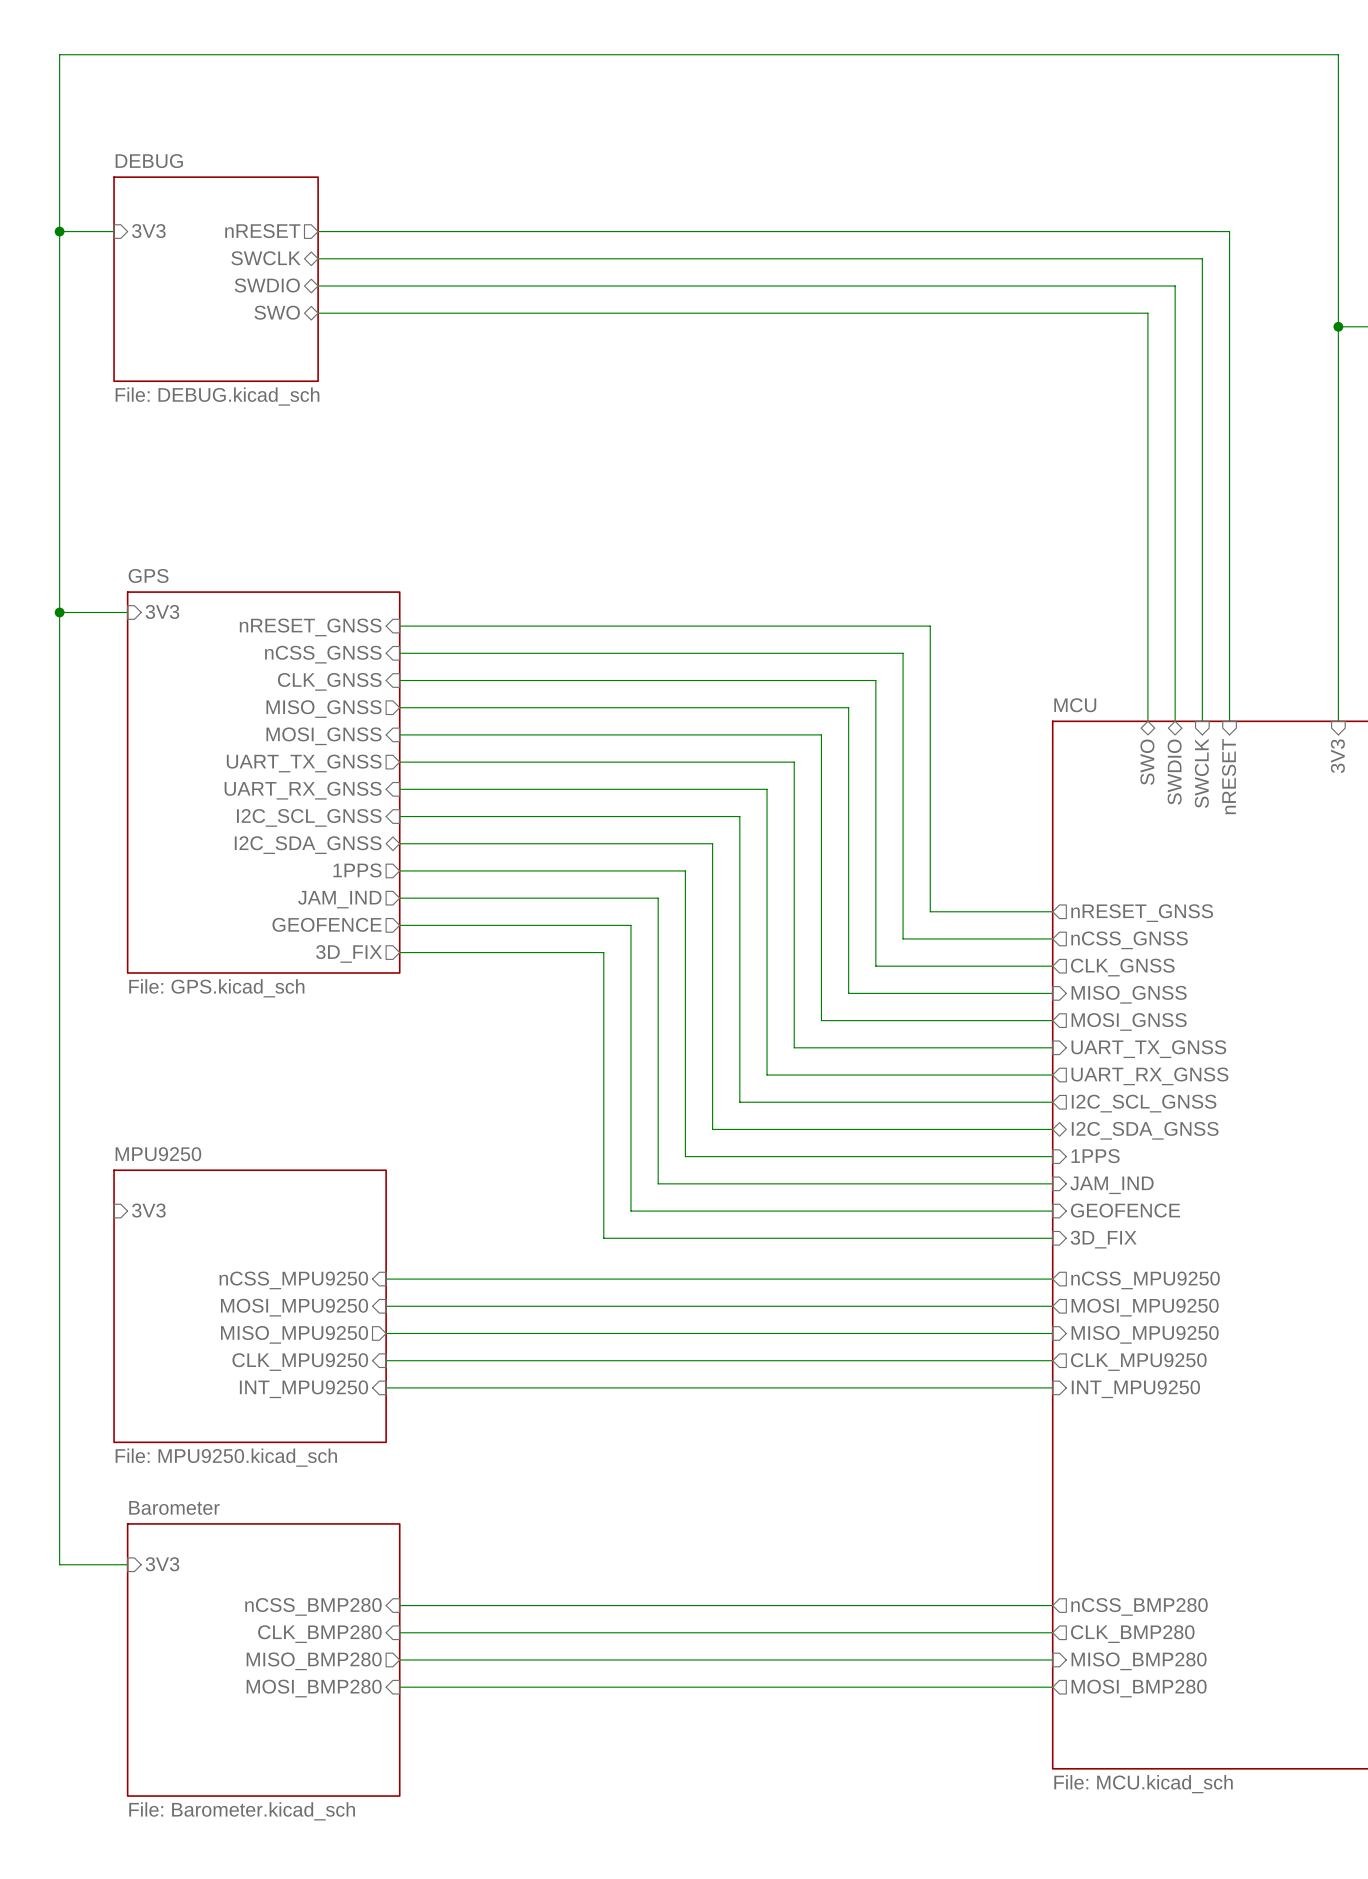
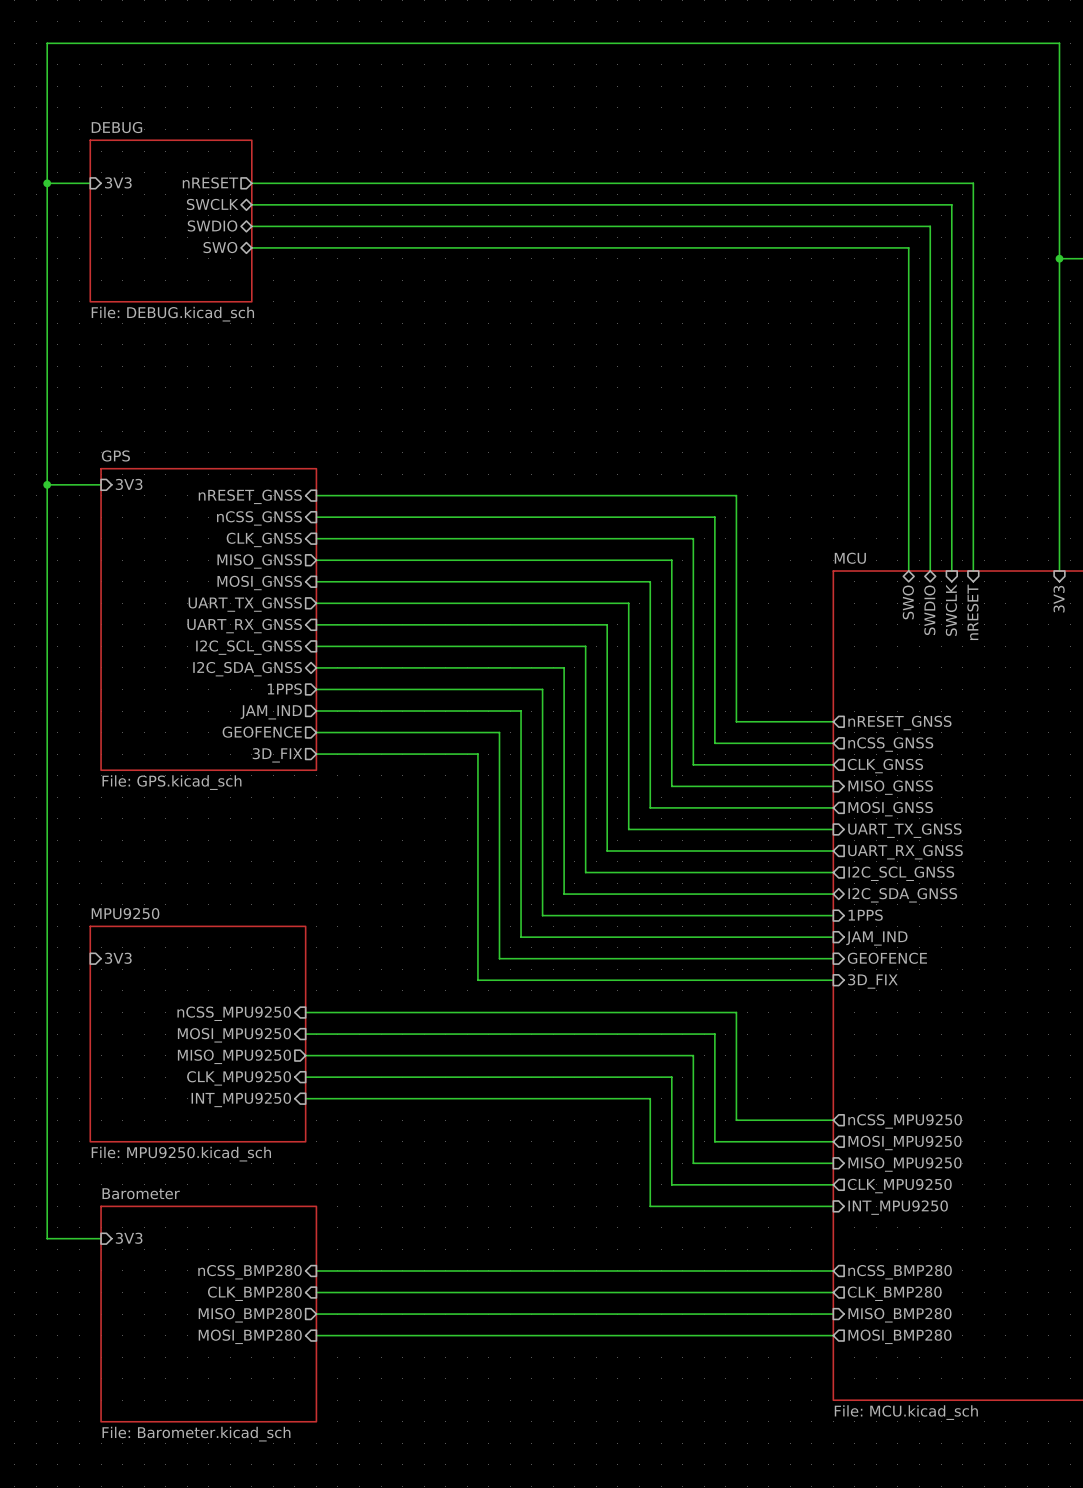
wire: (930, 1279) (1052, 1279) -> (736, 1012) (736, 1120) (833, 1120)
sheet pin position: nCSS_MPU9250 (1145, 1280) -> nCSS_MPU9250 (905, 1121)
wire: (903, 1306) (1052, 1306) -> (714, 1034) (714, 1141) (833, 1141)
sheet pin position: MOSI_MPU9250 (1145, 1307) -> MOSI_MPU9250 (905, 1143)
wire: (875, 1333) (1052, 1333) -> (693, 1055) (693, 1163) (833, 1163)
sheet pin position: MISO_MPU9250 (1145, 1334) -> MISO_MPU9250 (905, 1164)
wire: (848, 1360) (1052, 1360) -> (671, 1077) (671, 1184) (833, 1184)
sheet pin position: CLK_MPU9250 (1138, 1362) -> CLK_MPU9250 (899, 1186)
wire: (821, 1387) (1052, 1387) -> (650, 1098) (650, 1206) (833, 1206)
sheet pin position: INT_MPU9250 (1135, 1389) -> INT_MPU9250 (898, 1207)

